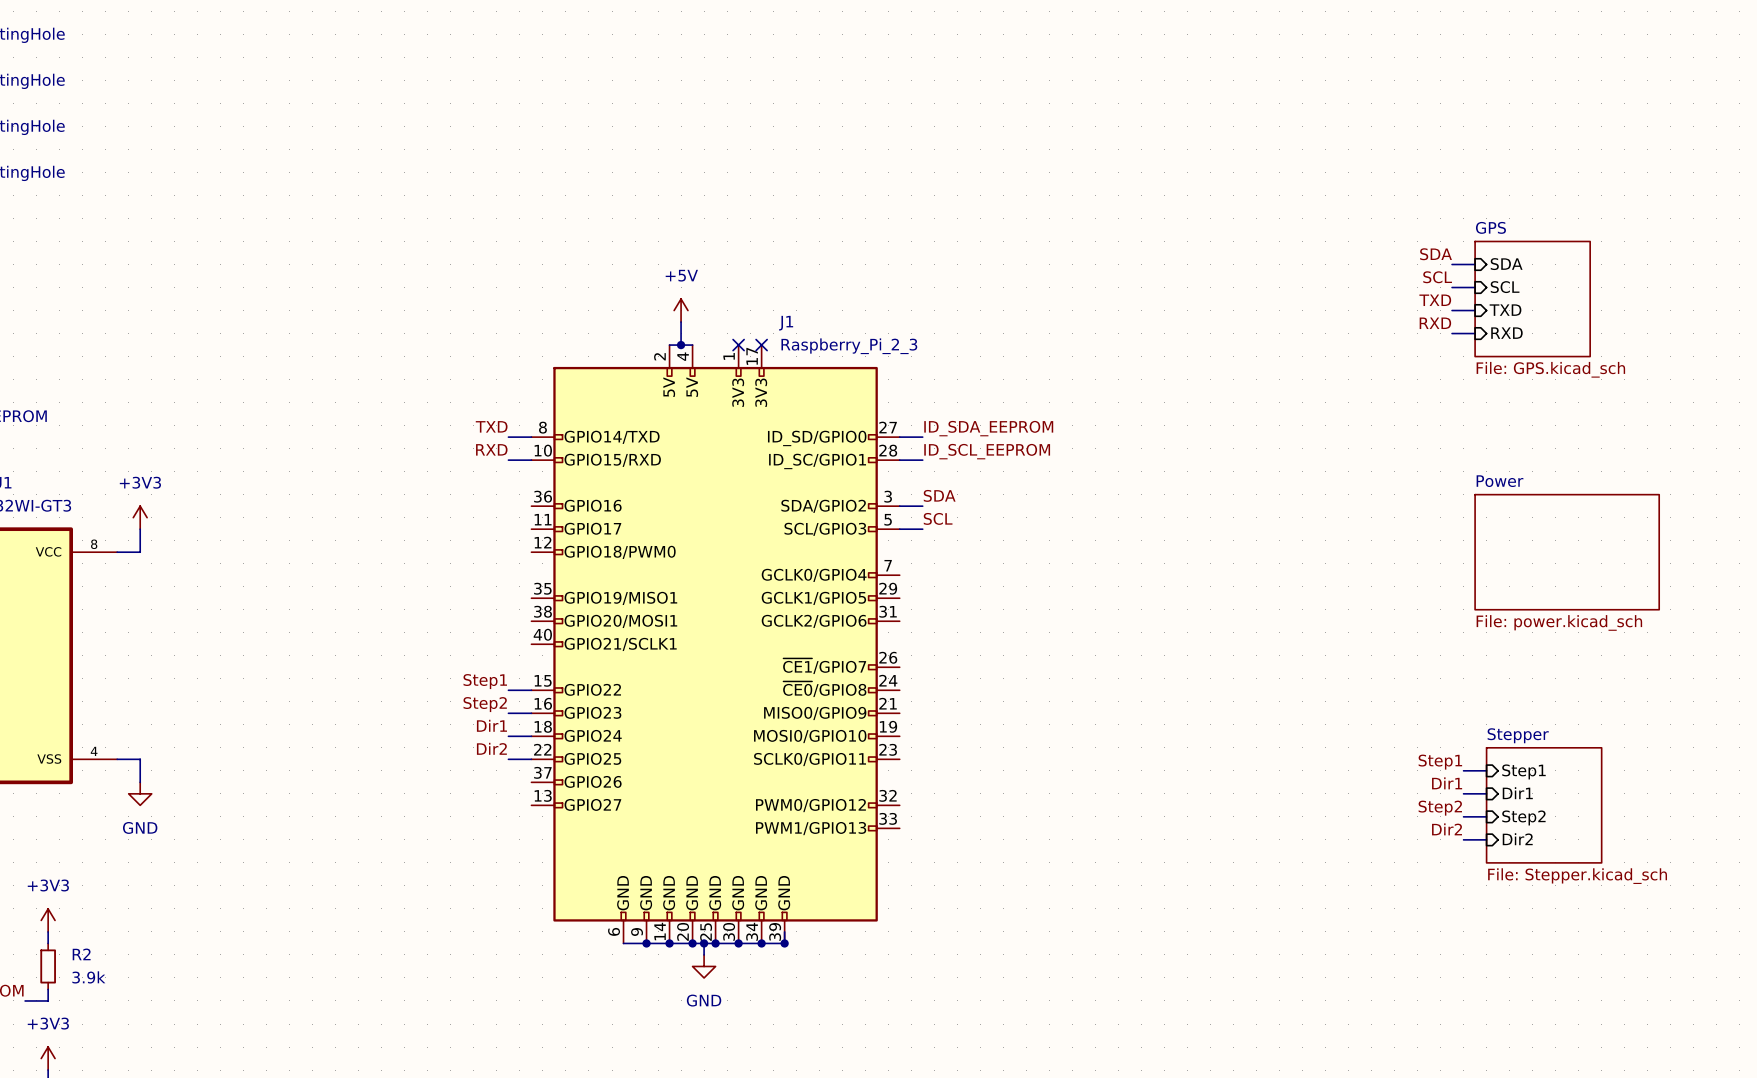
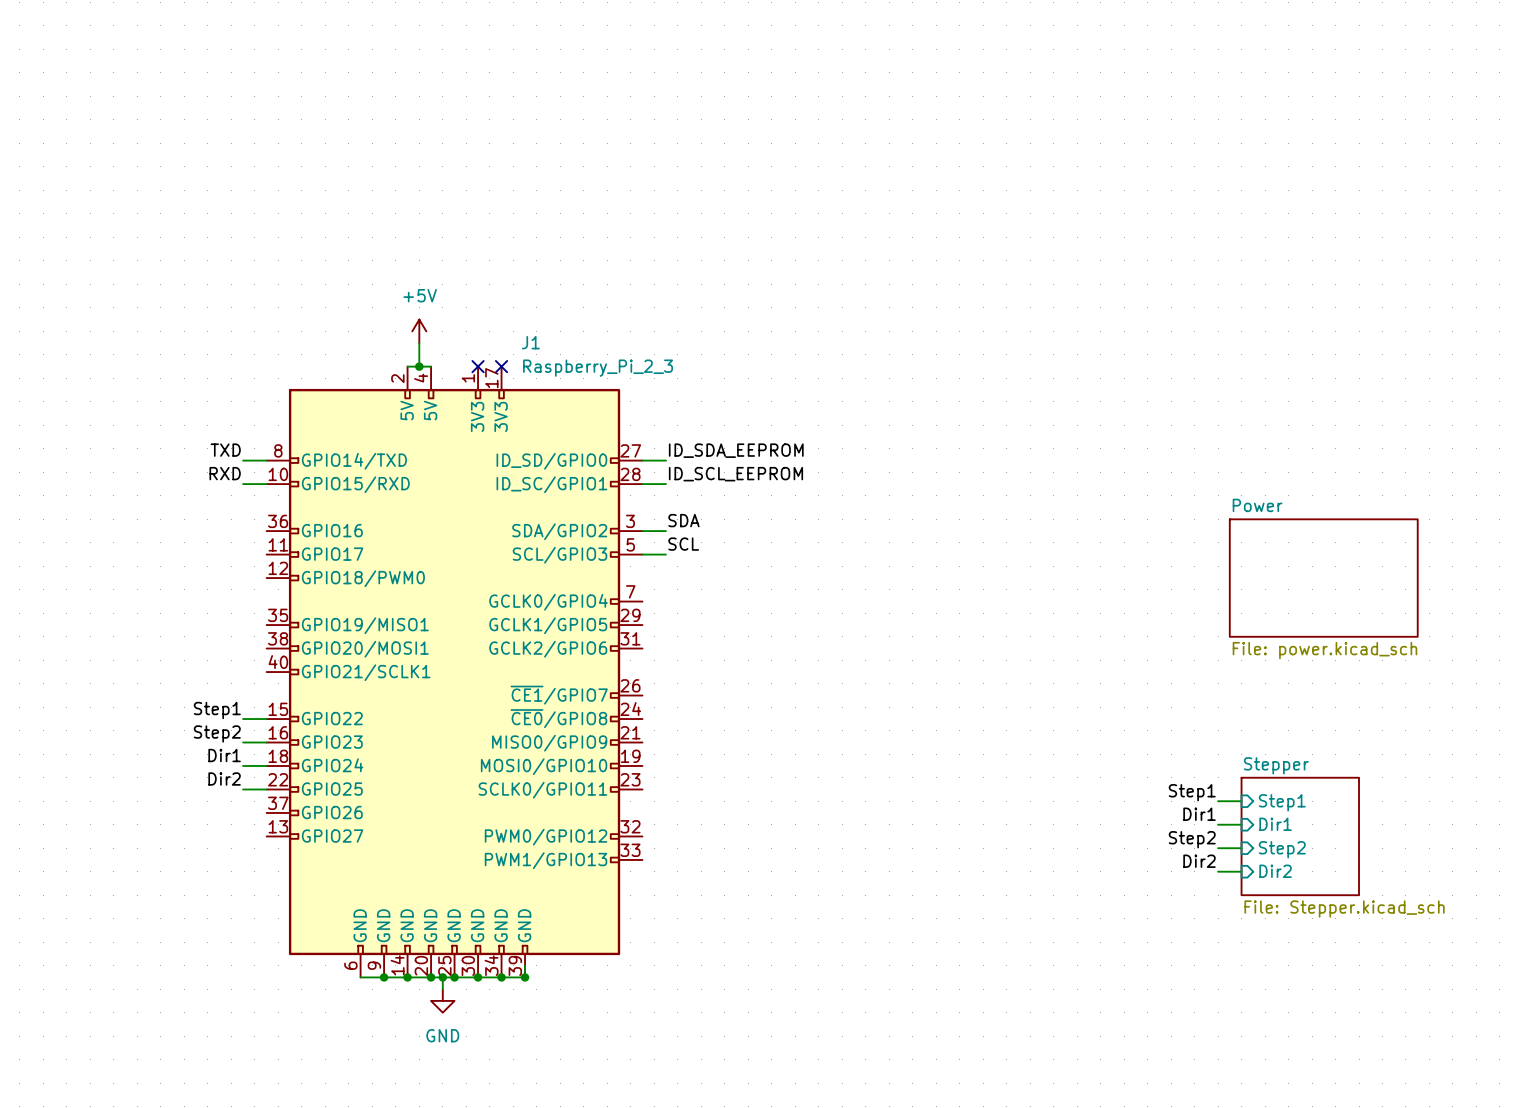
label: SDA (1436, 254) -> none
wire: (1452, 264) (1475, 264) -> none
sheet pin: SDA (1506, 264) -> none
label: SCL (1437, 277) -> none
wire: (1452, 287) (1475, 287) -> none
sheet pin: SCL (1505, 287) -> none
sheet GPS: File: GPS.kicad_sch (1532, 299) -> none
label: TXD (1435, 300) -> none
wire: (1452, 310) (1475, 310) -> none
sheet pin: TXD (1505, 310) -> none
label: RXD (1435, 323) -> none
wire: (1452, 333) (1475, 333) -> none
sheet pin: RXD (1506, 333) -> none

